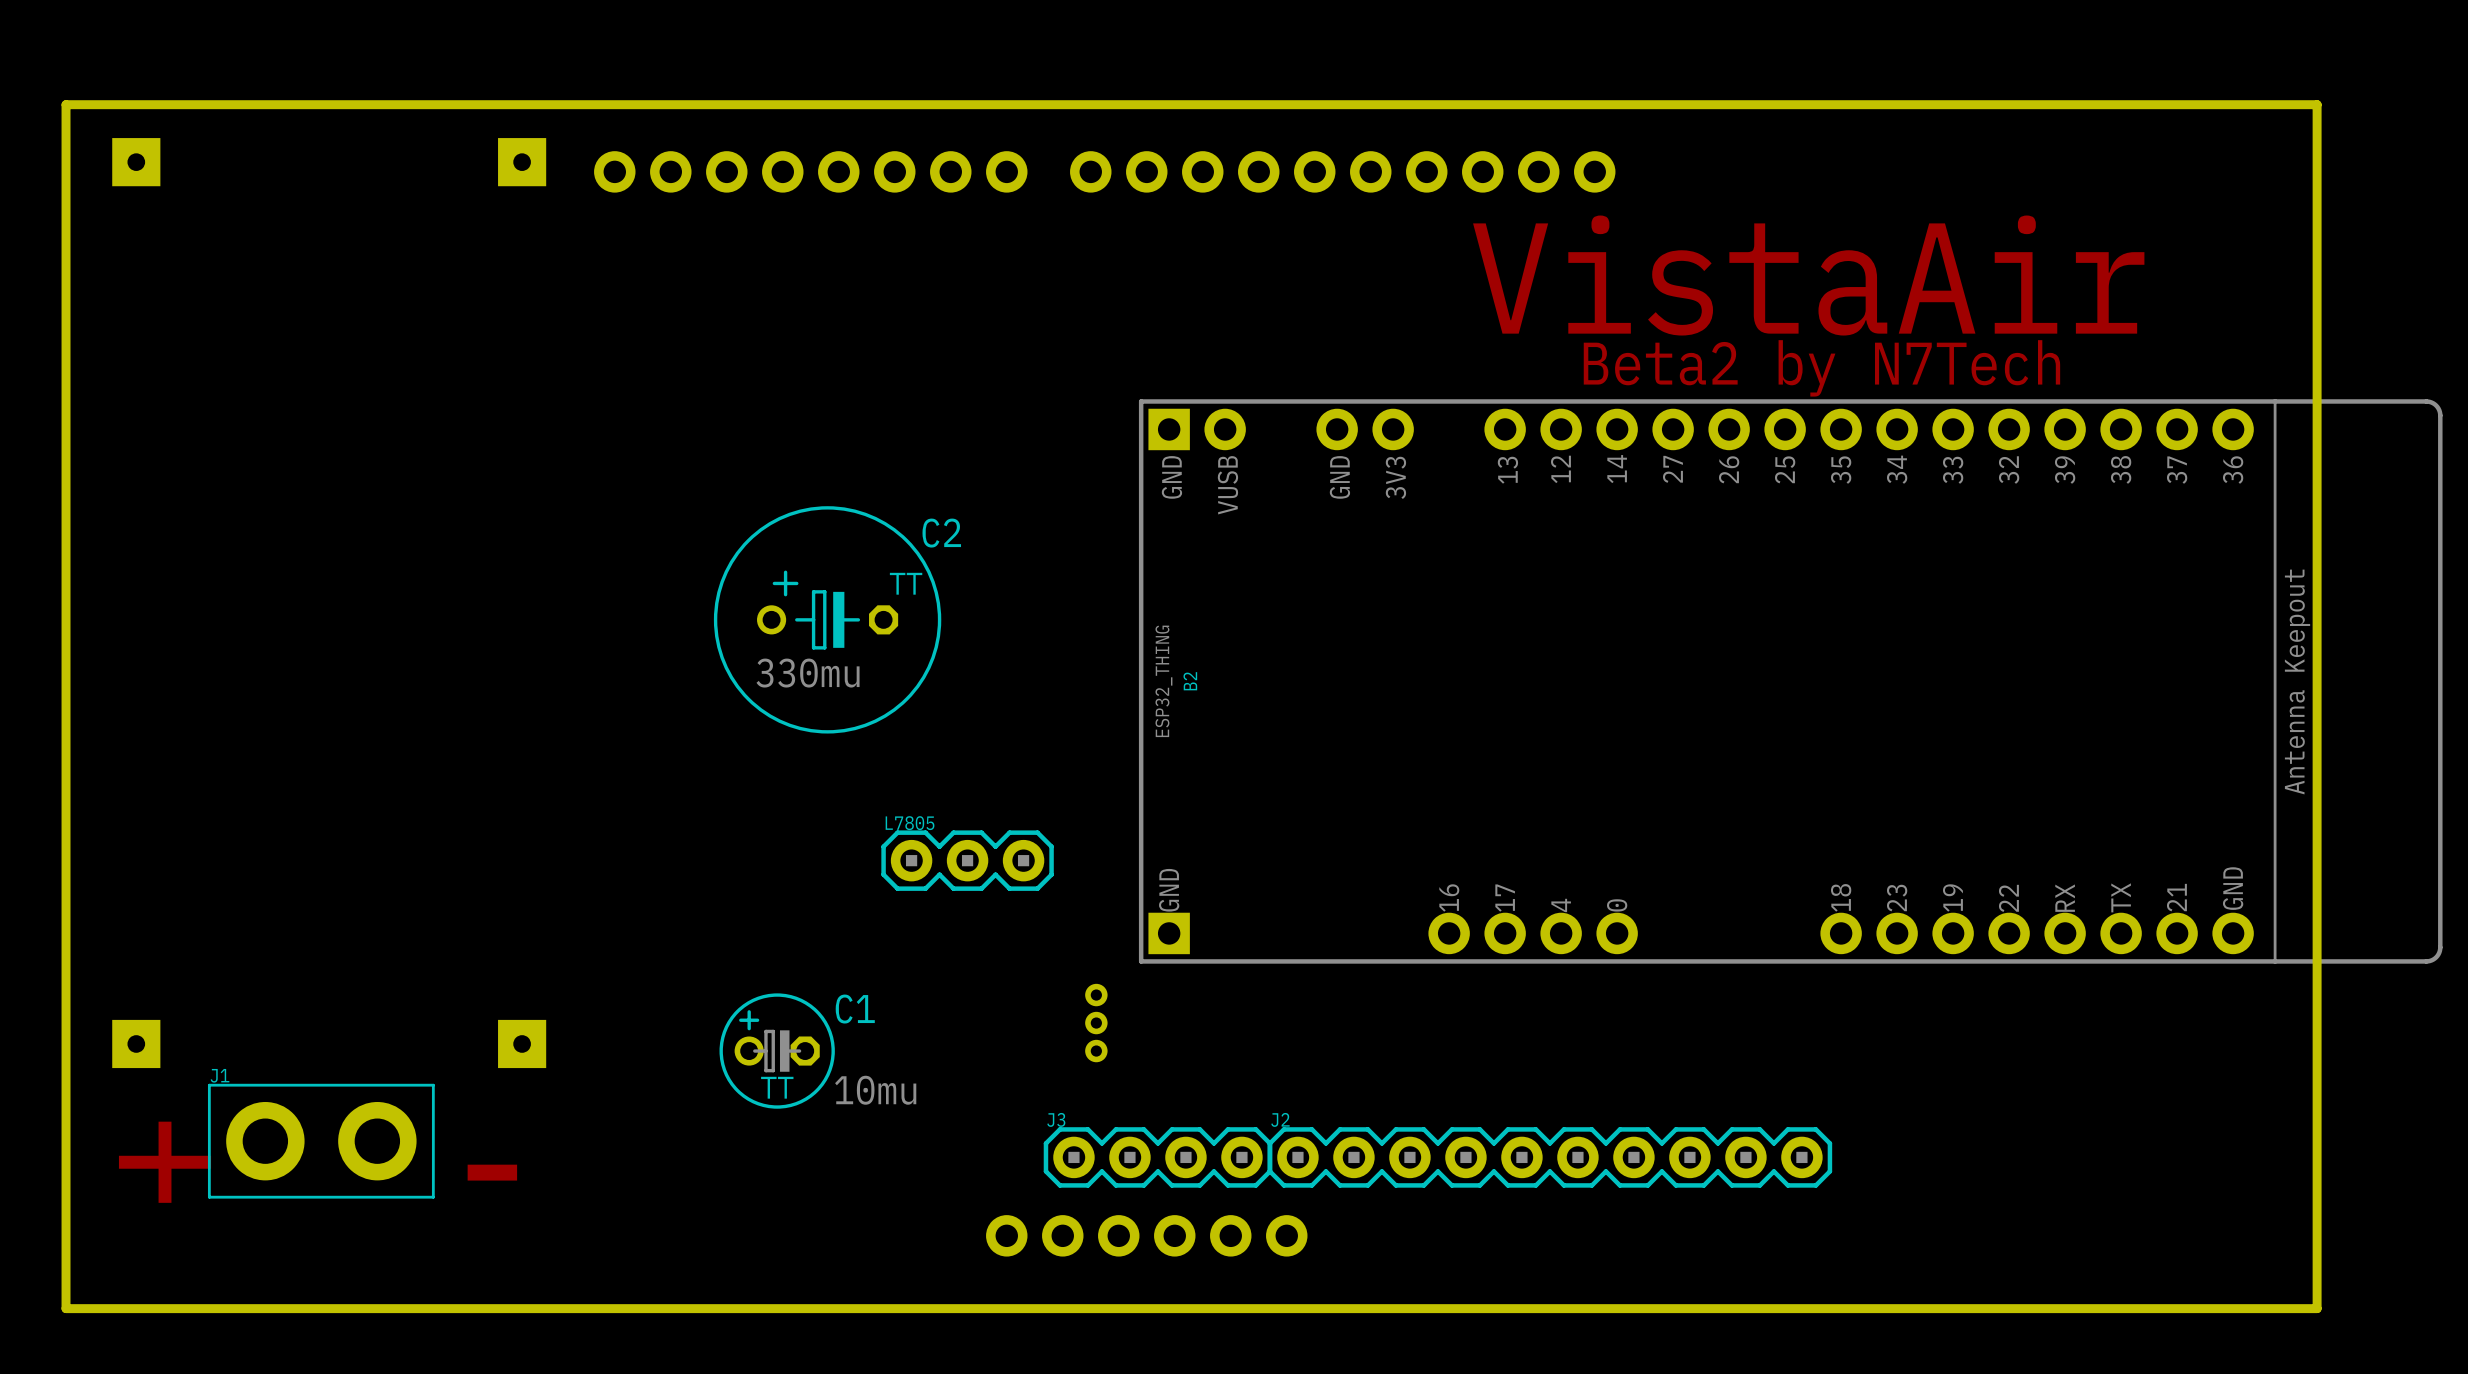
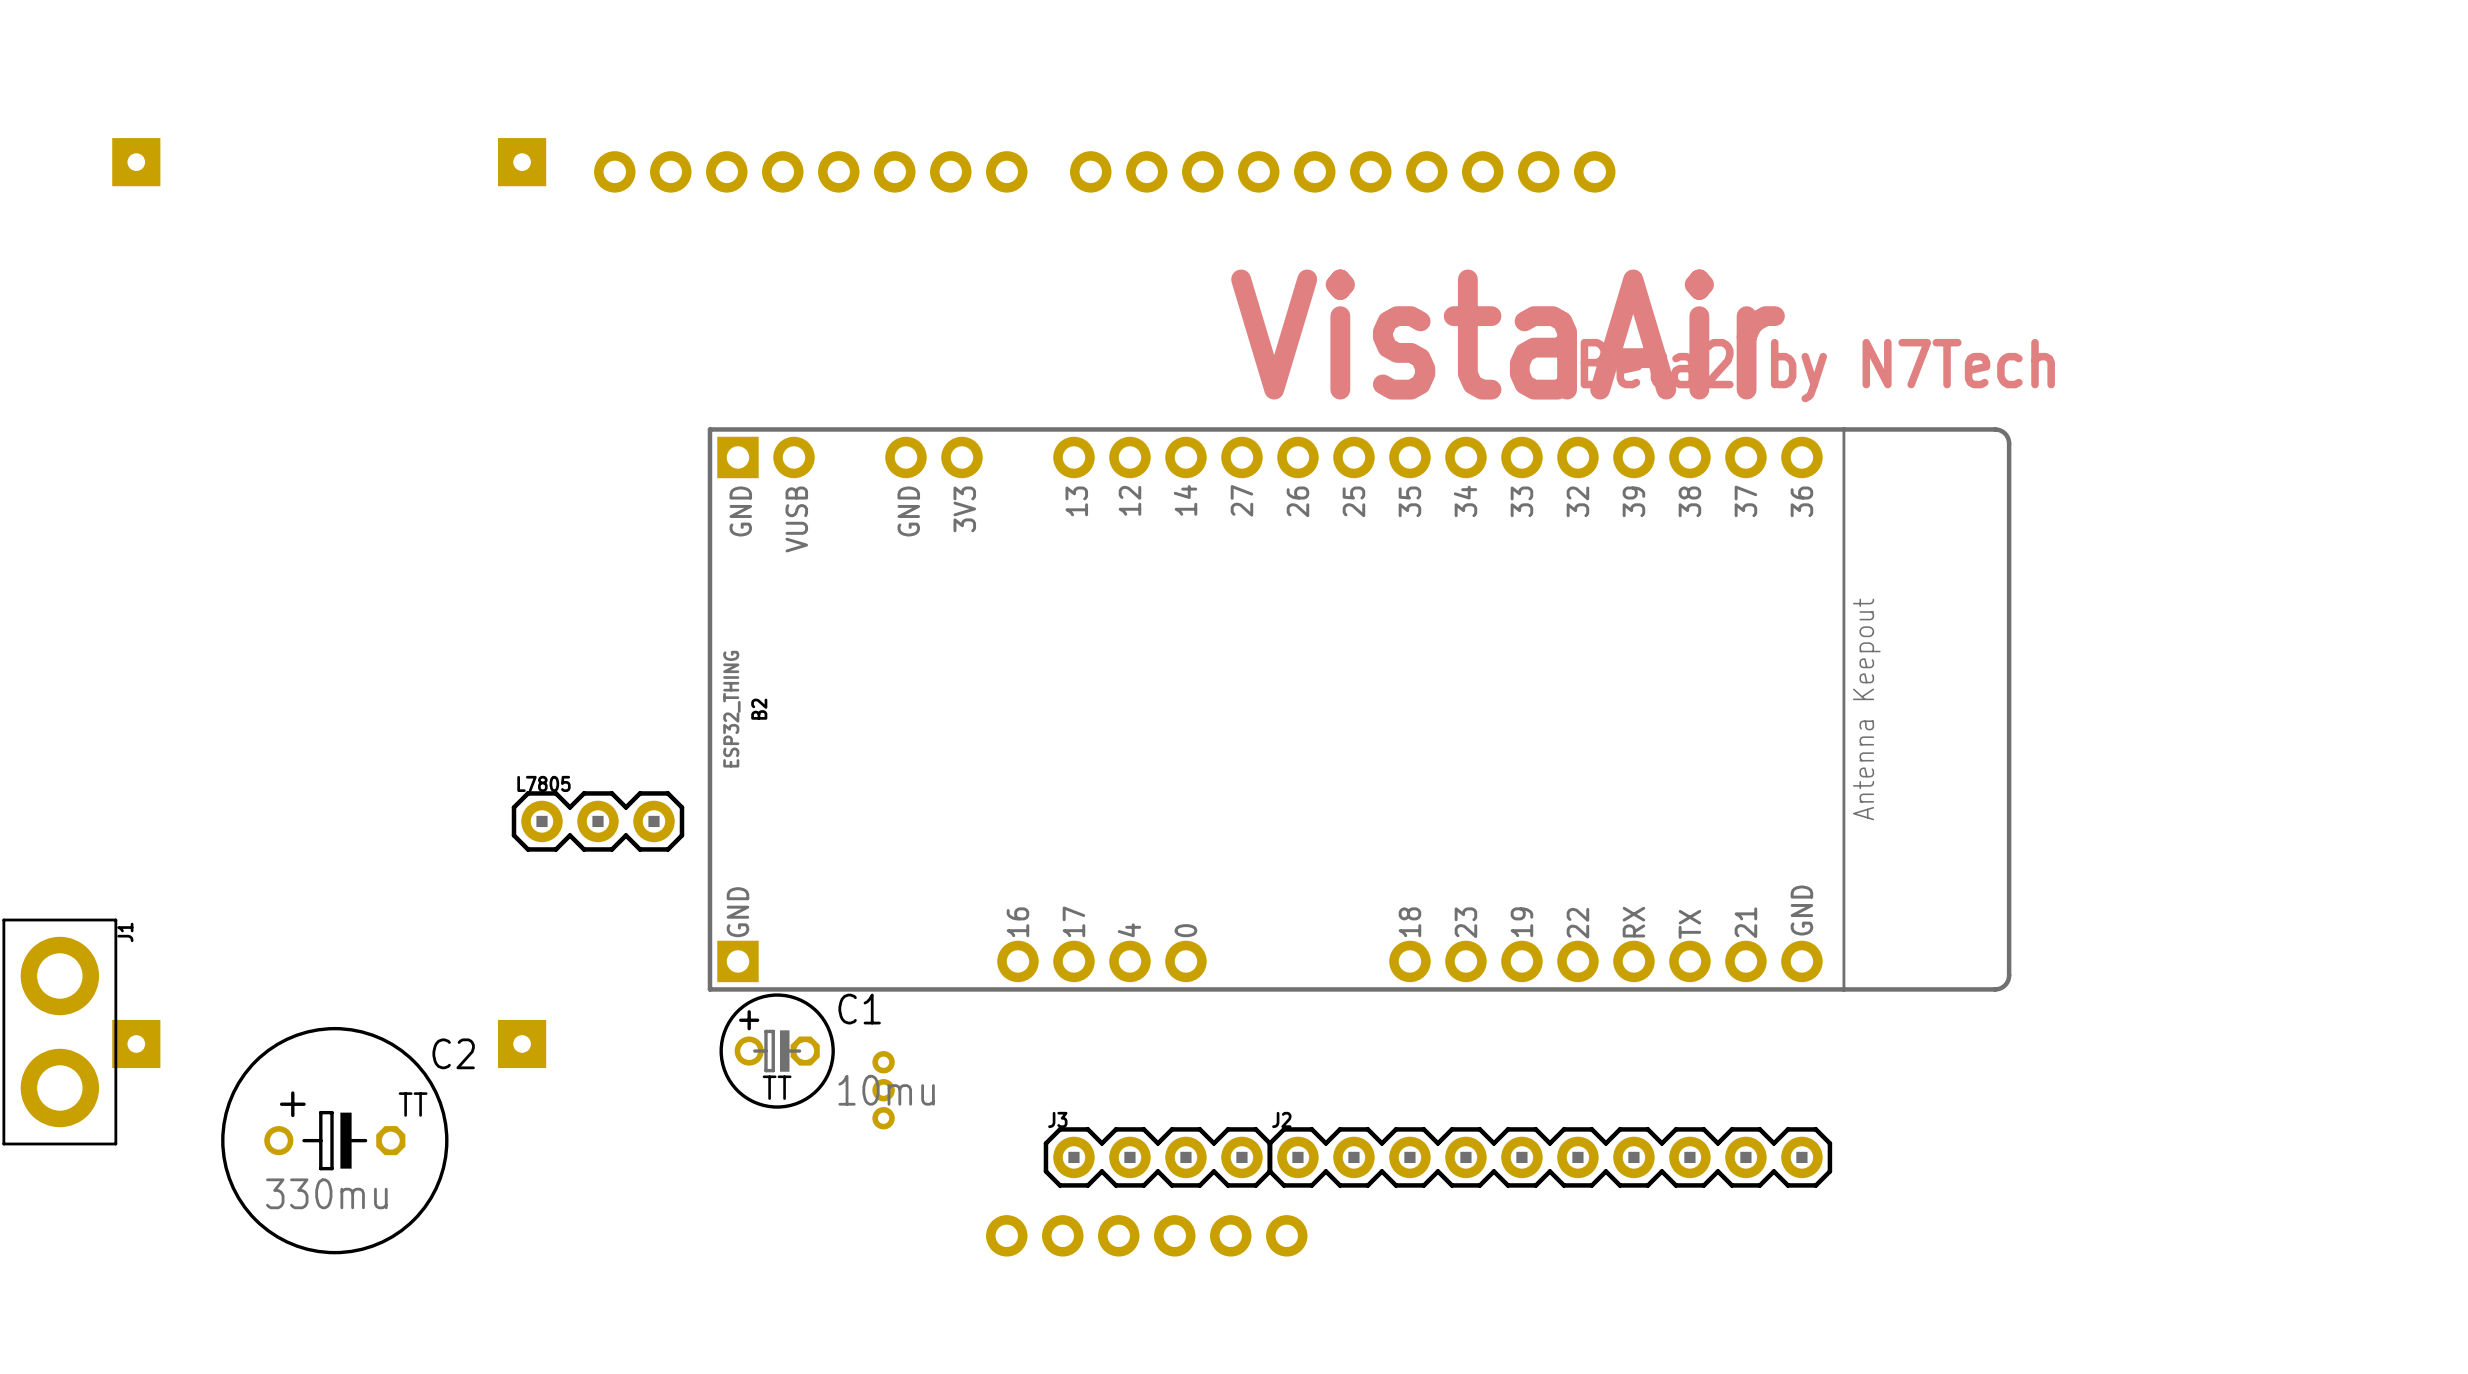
board edge: (66, 104) (2317, 104) (2317, 1308) (66, 1308) (66, 104) -> none
text position: VistaAir (1808, 275) -> VistaAir (1508, 334)
C2 position: (827, 619) -> (334, 1140)
B2 position: (1790, 681) -> (1359, 709)
L7805 position: (967, 860) -> (597, 821)
part position: (1096, 1023) -> (883, 1090)
J1 rotation: 0° (321, 1141) -> 90° clockwise (59, 1032)
J1 position: (321, 1141) -> (59, 1032)
text: + (165, 1162) -> none
text: - (492, 1172) -> none

